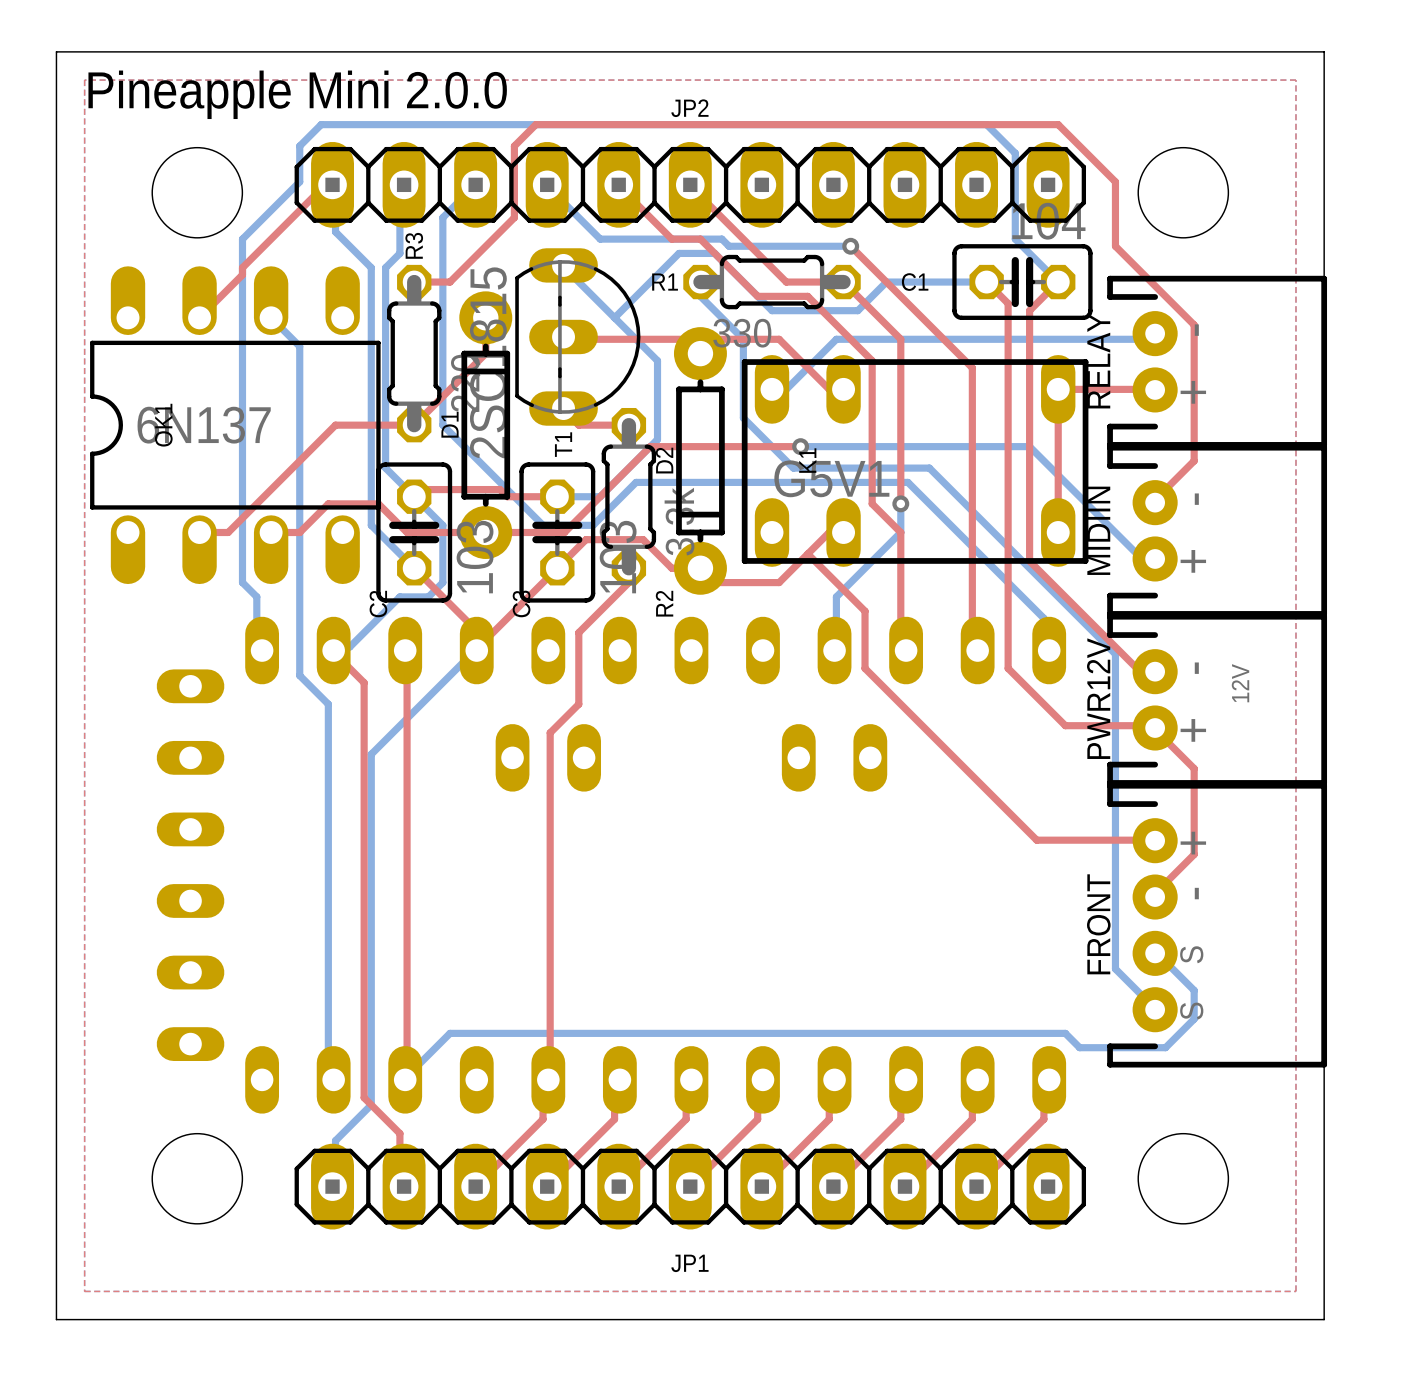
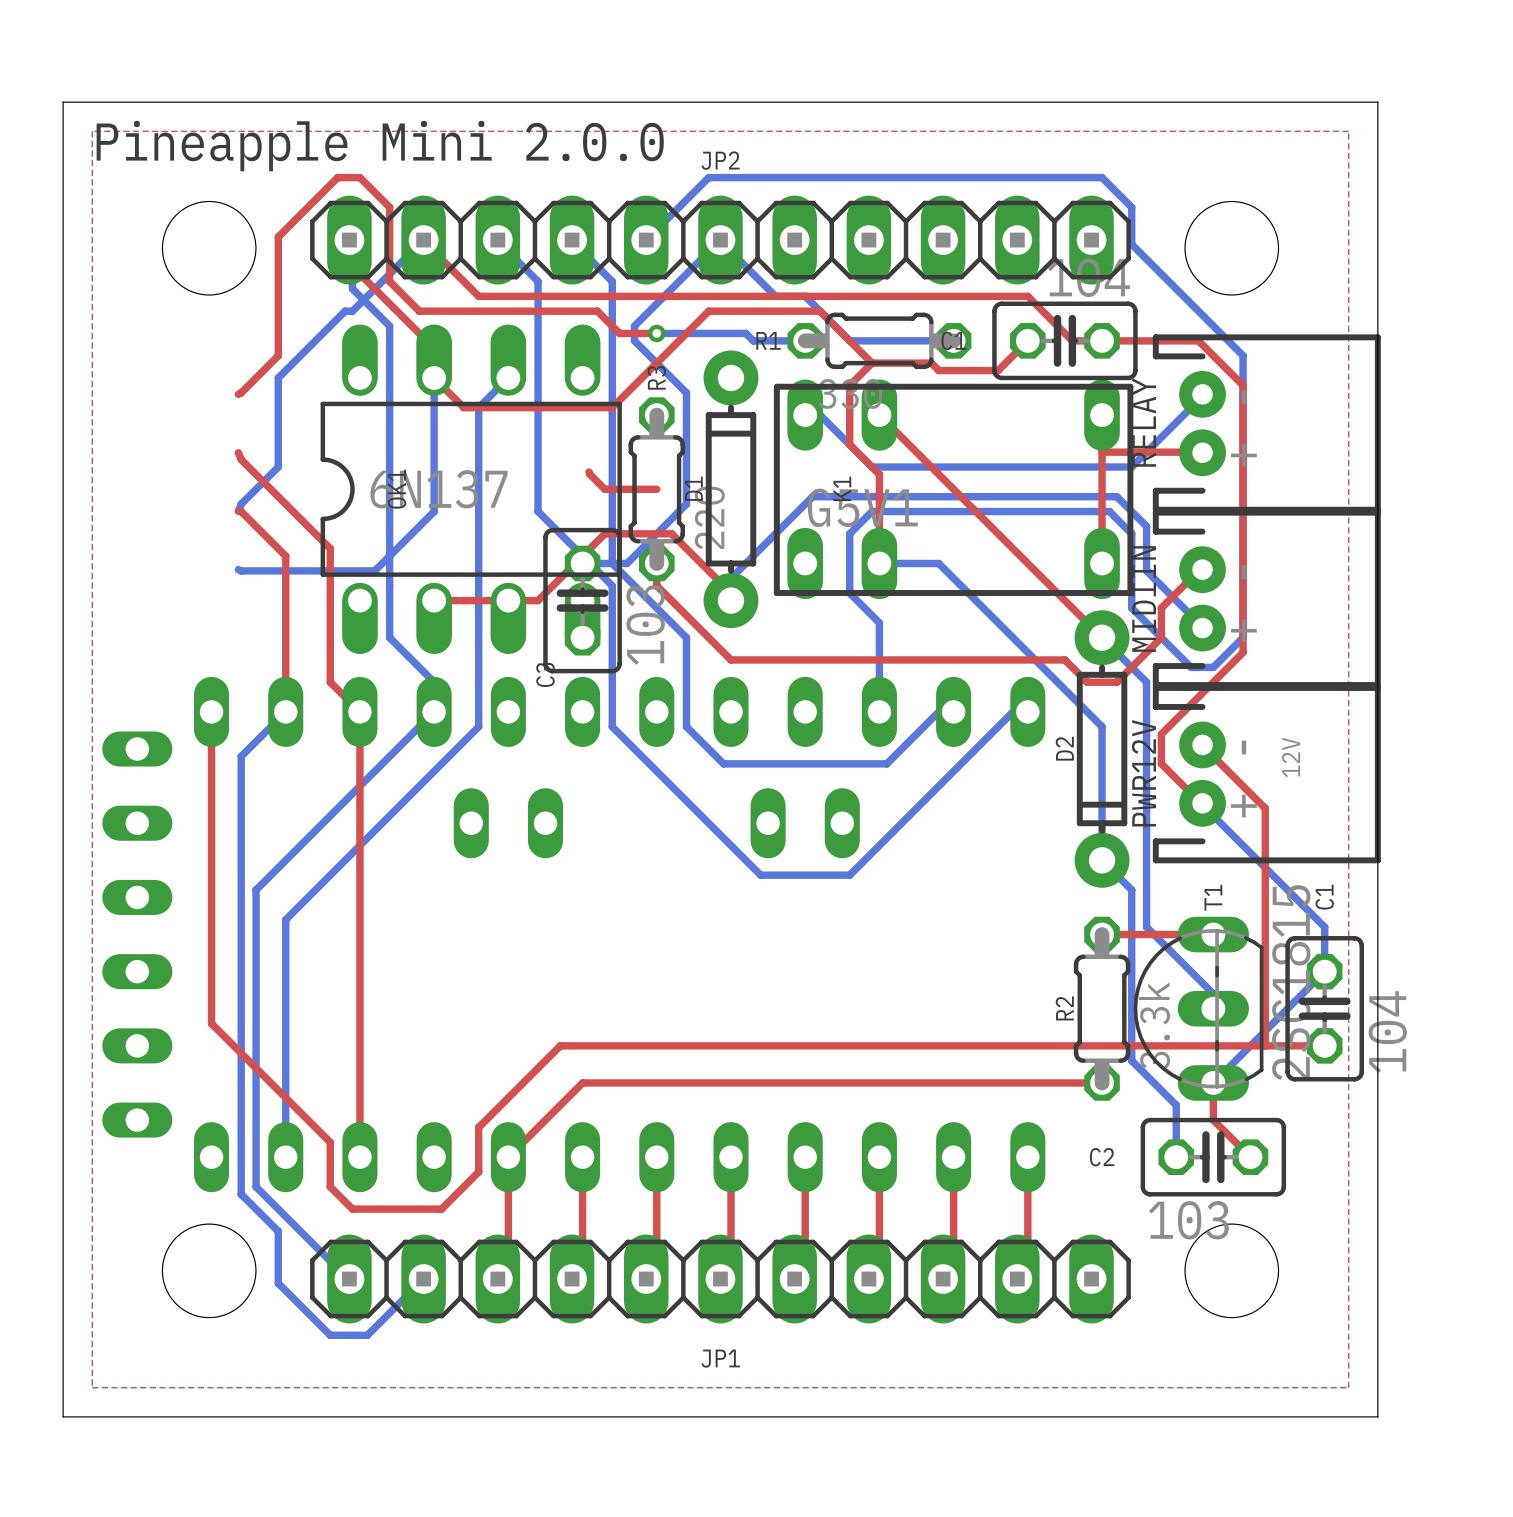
bottom track: (678, 124) (321, 124) (299, 146) (299, 181) (242, 239) (242, 582) (256, 596) (256, 646) (262, 650) -> (708, 177) (646, 240)
bottom track: (986, 124) (1015, 153) (1015, 239) (1058, 282) -> (1027, 177) (1102, 177) (1131, 207) (1131, 244) (1243, 355) (1243, 637) (1213, 667) (1191, 667) (1131, 608) (1131, 533) (1109, 511) (1072, 511)
top track: (332, 184) (328, 181) (242, 267) (242, 274) (199, 317) -> (349, 240) (352, 244) (352, 266) (434, 348) (434, 377) (463, 407) (612, 407) (708, 311) (820, 311) (871, 363)
bottom track: (475, 184) (442, 217) (442, 425) (543, 525) (593, 525) (636, 482) (907, 482) (1043, 618) (1043, 646) (1049, 650) -> (497, 240) (538, 281) (538, 511) (612, 585) (612, 726) (760, 875) (849, 875) (1012, 711) (1027, 711)
top track: (618, 184) (671, 239) -> (423, 240) (478, 296) (701, 296)
top track: (690, 184) (786, 282) (843, 282) (900, 339) (900, 503) -> none
bottom track: (399, 189) (399, 253) (385, 267) (385, 468) (442, 525) (442, 582) (428, 596) (399, 596) (349, 646) (335, 646) (333, 650) -> (419, 244) (352, 311) (345, 311) (278, 377) (278, 467) (241, 504) (238, 511)
bottom track: (585, 224) (600, 239) (721, 239) (729, 246) (850, 246) -> (612, 281) (612, 563) (686, 637) (686, 726) (723, 763) (886, 763) (938, 711) (953, 711)
top track: (700, 239) (757, 296) (807, 296) (872, 360) (872, 503) (900, 532) (900, 646) (906, 650) -> none
top track: (850, 246) (972, 367) (972, 646) (977, 650) -> none
via: (850, 246) -> none
bottom track: (563, 265) (657, 360) -> none
top track: none -> (656, 333) (619, 333) (597, 311) (419, 311) (389, 281) (389, 207) (359, 177) (337, 177) (278, 236) (278, 355) (238, 394)
bottom track: none -> (656, 333) (745, 333) (753, 340) (805, 340)
via: none -> (656, 333)
top track: (414, 282) (450, 282) (514, 217) (514, 146) (535, 124) (1058, 124) (1115, 181) (1115, 246) (1151, 282) -> (730, 296) (1027, 296) (1072, 340) (1198, 340)
bottom track: (700, 282) (700, 296) (743, 339) (743, 418) (793, 468) (929, 468) (1115, 654) (1115, 968) (1155, 1009) -> none
R1 position: (772, 282) -> (879, 340)
bottom track: (886, 282) (857, 310) (772, 310) (714, 253) (678, 253) (614, 317) -> (923, 340) (849, 340) (805, 296) (775, 296) (720, 240) (634, 326) (634, 340) (686, 392) (686, 422)
bottom track: (915, 282) (986, 282) -> none
top track: (986, 282) (1008, 303) (1008, 668) (1065, 725) (1151, 725) -> (1027, 340) (998, 370) (938, 370) (931, 363) (871, 363)
top track: (1058, 282) (1029, 310) (1029, 561) (1136, 668) (1151, 668) (1155, 671) -> (1265, 1045) (1265, 808) (1202, 744)
top track: none -> (871, 363) (849, 385) (849, 444) (879, 474) (879, 563)
bottom track: (271, 317) (299, 346) (299, 675) (328, 704) (328, 1076) (333, 1079) -> none
bottom track: none -> (434, 377) (434, 511) (374, 570) (238, 569)
top track: (485, 317) (485, 353) (414, 425) (335, 425) (228, 532) (199, 532) -> none
bottom track: none -> (508, 377) (478, 407) (478, 726) (285, 919) (285, 1157)
top track: (563, 336) (564, 339) (686, 339) (700, 353) (714, 339) (779, 339) (829, 389) (843, 389) -> none
T1 rotation: 0° (577, 336) -> 180° (1198, 1008)
T1 position: (577, 336) -> (1198, 1008)
bottom track: (1151, 339) (836, 339) (786, 389) (772, 389) -> (1198, 400) (1131, 467) (871, 467) (820, 415) (805, 415)
R3 position: (414, 353) -> (656, 489)
top track: none -> (879, 415) (1102, 637)
top track: none -> (238, 452) (241, 459) (330, 548) (330, 682) (359, 711) (359, 1157)
OK1 position: (235, 425) -> (471, 489)
D1 position: (485, 425) -> (730, 489)
top track: none -> (238, 511) (241, 511) (285, 556) (285, 711)
top track: (800, 446) (650, 446) (564, 532) (514, 532) -> (730, 600) (730, 593) (671, 533) (604, 533) (538, 600)
bottom track: (800, 446) (836, 446) -> (879, 711) (879, 622) (849, 593) (849, 533) (871, 511)
via: (800, 446) -> none
bottom track: (1029, 446) (1136, 553) (1151, 553) -> (730, 600) (730, 578) (812, 496) (1116, 496) (1146, 526) (1146, 570) (1198, 622)
D2 position: (700, 460) -> (1102, 749)
K1 position: (915, 460) -> (953, 489)
top track: (1194, 460) (1158, 496) (1155, 502) -> (1243, 526) (1243, 652) (1161, 734) (1161, 763) (1198, 800)
top track: (414, 496) (421, 489) (500, 489) (507, 496) (557, 496) -> none
top track: none -> (656, 563) (656, 585) (730, 659) (1064, 659) (1087, 682) (1116, 682) (1161, 637) (1161, 608) (1198, 570) (1202, 569)
R2 position: (628, 496) -> (1102, 1008)
bottom track: none -> (879, 563) (938, 563) (1102, 726) (1102, 860) (1131, 890) (1131, 1060) (1176, 1105) (1176, 1157)
bottom track: (900, 503) (900, 532) (836, 596) (836, 646) (834, 650) -> none
via: (900, 503) -> none
bottom track: (371, 525) (414, 568) -> none
top track: (271, 532) (299, 532) (328, 503) (378, 503) (407, 532) (414, 532) -> none
C2 rotation: 0° (414, 532) -> 90° clockwise (1213, 1157)
C2 position: (414, 532) -> (1213, 1157)
top track: (843, 532) (829, 532) (779, 582) (714, 582) (700, 568) (671, 568) (643, 539) (585, 539) (476, 650) (471, 646) (471, 625) (414, 568) -> none
top track: (807, 553) (865, 611) (865, 668) (1036, 840) (1155, 840) -> none
top track: (628, 568) (628, 582) (578, 632) (578, 704) (550, 732) (550, 1076) (543, 1083) (543, 1119) (485, 1176) -> (1102, 1082) (582, 1082) (508, 1157) (508, 1268)
bottom track: none -> (1102, 637) (1146, 682) (1146, 927) (1213, 993) (1213, 1008)
R2 name position: R2 (664, 603) -> R2 (1064, 1008)
top track: none -> (211, 711) (211, 1023) (330, 1142) (330, 1186) (352, 1209) (441, 1209) (478, 1172) (478, 1127) (560, 1045) (1324, 1045)
bottom track: none -> (285, 711) (241, 756) (241, 1194) (278, 1231) (278, 1283) (330, 1335) (367, 1335) (423, 1279)
top track: (333, 650) (364, 682) (364, 1097) (399, 1133) (399, 1183) (404, 1186) -> none
top track: (405, 650) (407, 654) (407, 1076) (405, 1079) -> none
bottom track: (476, 650) (371, 754) (371, 1104) (335, 1140) (335, 1183) (332, 1186) -> (389, 593) (389, 637) (434, 682) (434, 711) (256, 890) (256, 1186) (349, 1279)
top track: (1155, 728) (1194, 768) (1194, 854) (1158, 890) (1155, 897) -> none
bottom track: none -> (1202, 803) (1324, 927) (1324, 971) (1213, 1082)
top track: none -> (1102, 934) (1213, 934)
part position: (611, 865) -> (573, 934)
FRONT: (1217, 925) -> none
C1: none -> 104 (1324, 1008)
bottom track: (1155, 953) (1194, 990) (1194, 1019) (1165, 1047) (1079, 1047) (1065, 1033) (450, 1033) (405, 1079) -> none
top track: none -> (1213, 1082) (1213, 1120) (1250, 1157)
top track: (619, 1079) (614, 1083) (614, 1119) (557, 1176) -> (582, 1157) (582, 1268)
top track: (691, 1079) (686, 1083) (686, 1119) (628, 1176) -> (656, 1157) (656, 1268)
top track: (762, 1079) (757, 1083) (757, 1119) (700, 1176) -> (730, 1157) (730, 1268)
top track: (834, 1079) (829, 1083) (829, 1119) (772, 1176) -> (805, 1157) (805, 1268)
top track: (906, 1079) (900, 1083) (900, 1119) (843, 1176) -> (879, 1157) (879, 1268)
top track: (977, 1079) (972, 1083) (972, 1119) (915, 1176) -> (953, 1157) (953, 1268)
top track: (1049, 1079) (1043, 1083) (1043, 1119) (986, 1176) -> (1027, 1157) (1027, 1268)

